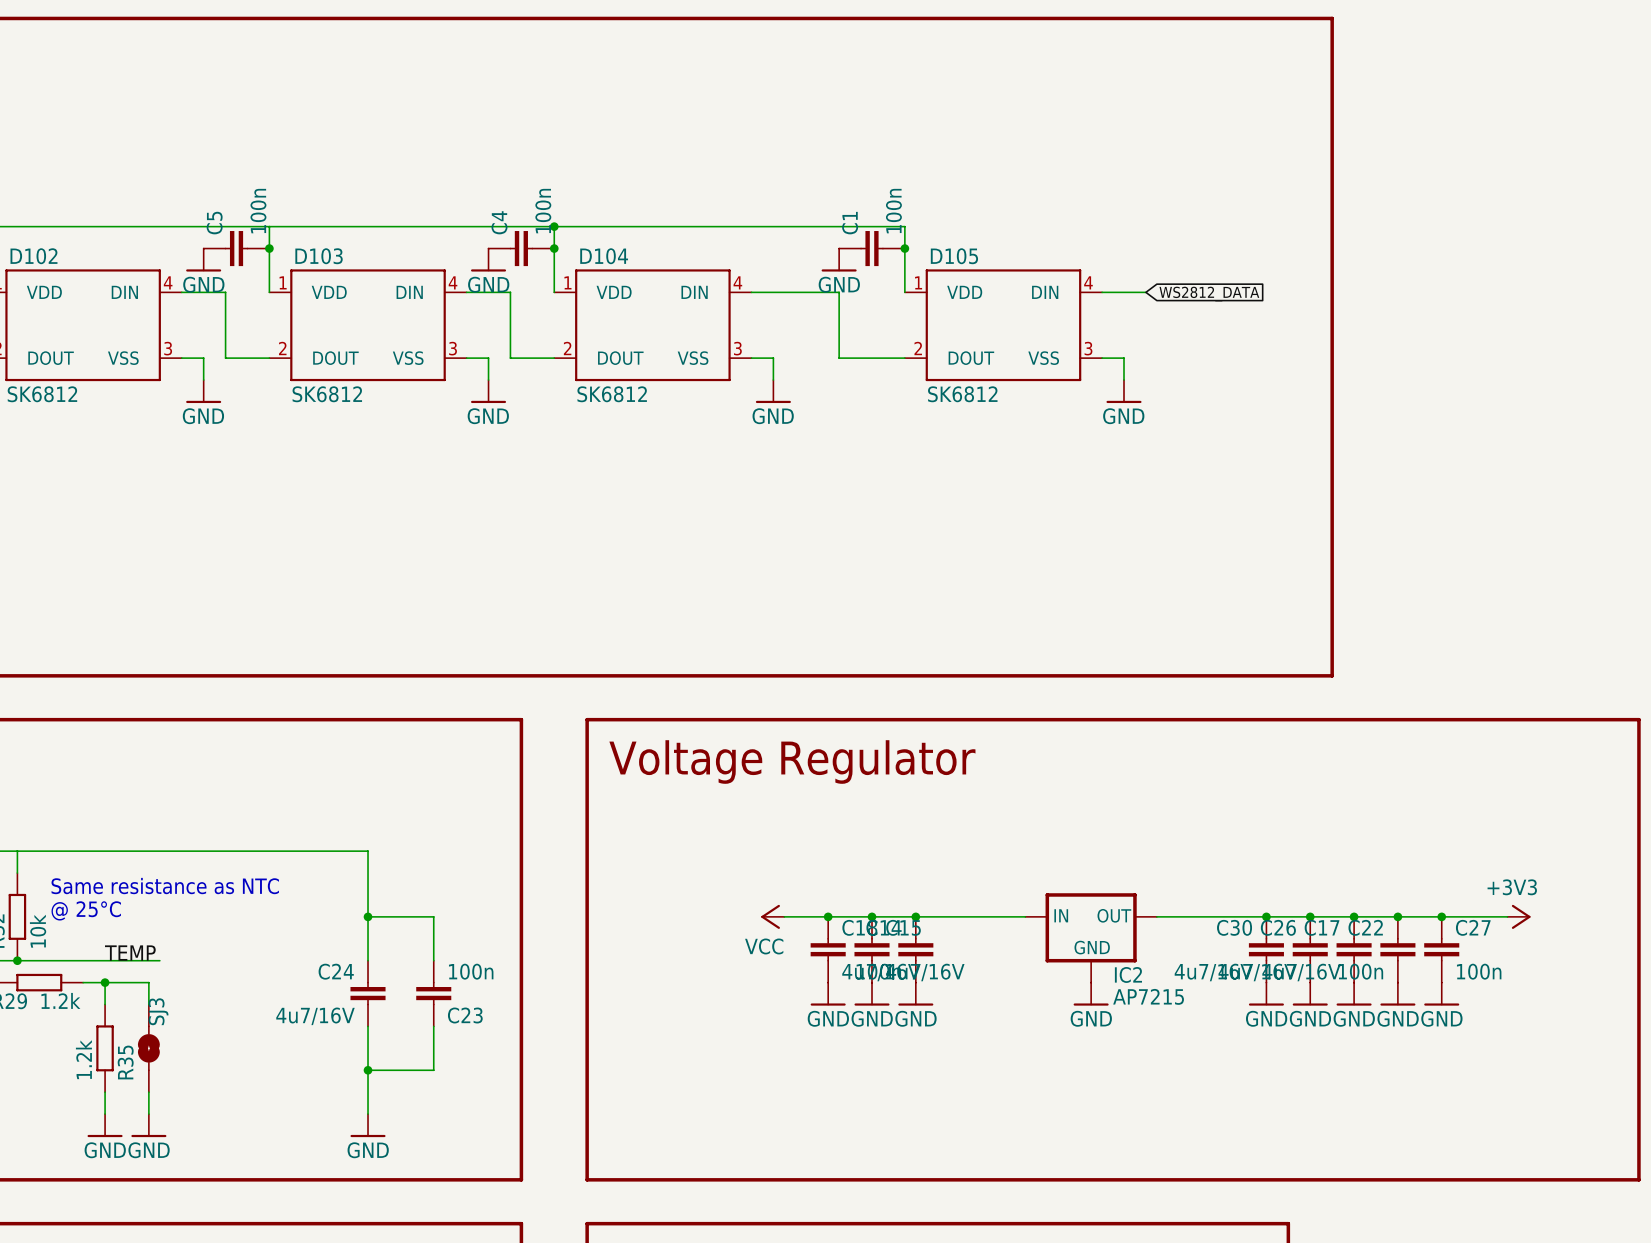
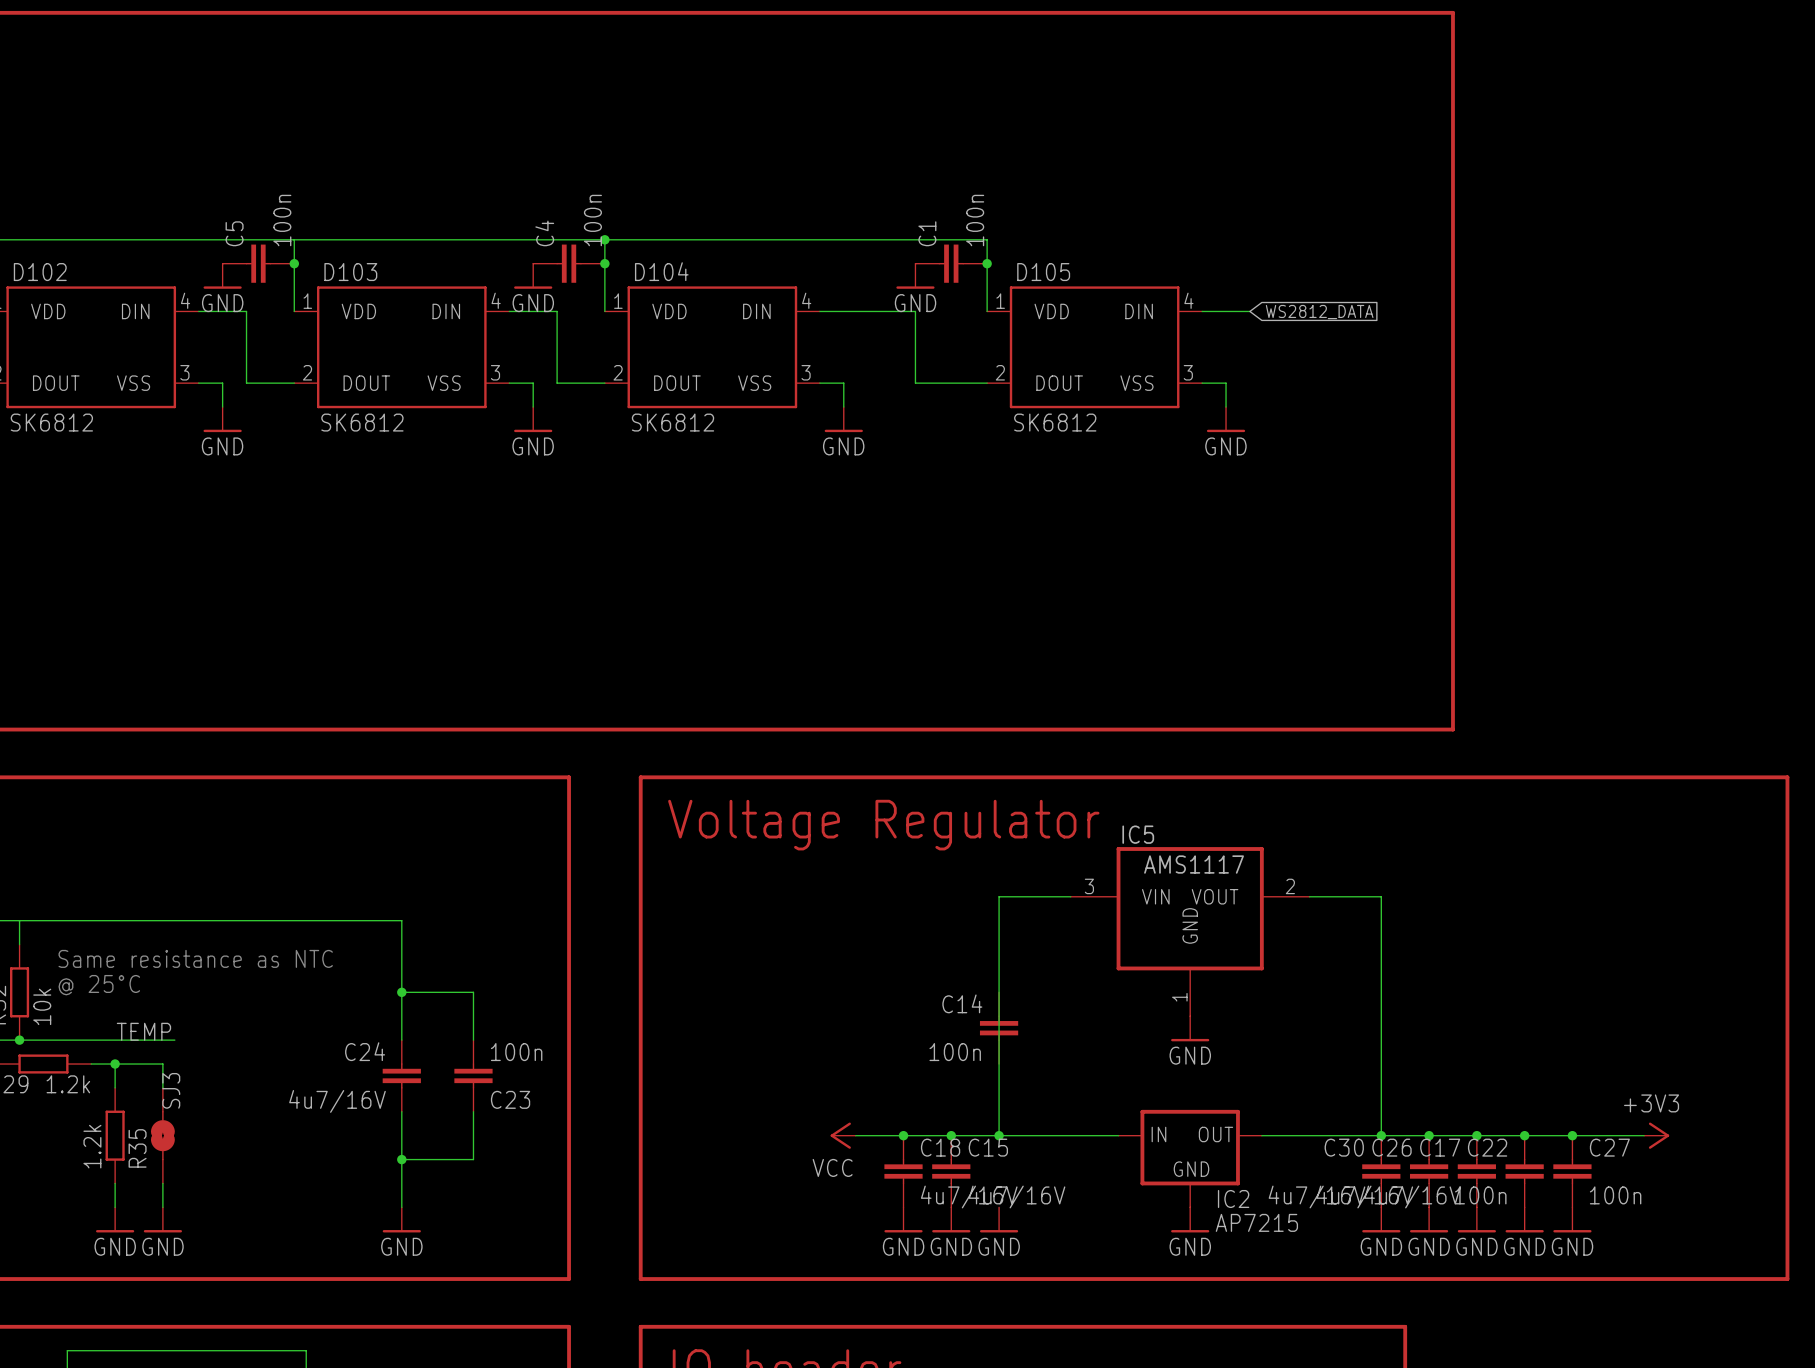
wire: none -> (1070, 896) (999, 896) (999, 1135)
wire: none -> (1309, 896) (1381, 896) (1381, 1135)
IC5: none -> AMS1117 (1190, 931)
power symbol position: VCC (772, 916) -> VCC (843, 1135)
wire: (784, 916) (1025, 916) -> (855, 1135) (1118, 1135)
junction: (828, 916) -> none
junction: (872, 916) -> none
junction: (915, 916) -> none
wire: (1156, 916) (1507, 916) -> (1261, 1135) (1644, 1135)
junction: (1266, 916) -> none
junction: (1310, 916) -> none
junction: (1354, 916) -> none
junction: (1397, 916) -> none
junction: (1441, 916) -> none
power symbol position: +3V3 (1518, 916) -> +3V3 (1656, 1135)
IC2 position: (1091, 937) -> (1190, 1158)
C18 position: (828, 949) -> (903, 1171)
C15 position: (872, 949) -> (951, 1171)
C30 position: (1266, 949) -> (1381, 1171)
C26 position: (1310, 949) -> (1429, 1171)
C17 position: (1354, 949) -> (1476, 1171)
C22 position: (1397, 949) -> (1524, 1171)
C27 position: (1441, 949) -> (1572, 1171)
power symbol: GND (828, 994) -> none
power symbol: GND (872, 994) -> none
power symbol: GND (915, 994) -> none
power symbol position: GND (1091, 994) -> GND (1190, 1028)
power symbol: GND (1266, 994) -> none
power symbol: GND (1310, 994) -> none
power symbol: GND (1354, 994) -> none
power symbol: GND (1397, 994) -> none
power symbol: GND (1441, 994) -> none
junction: none -> (903, 1135)
junction: none -> (951, 1135)
junction: none -> (999, 1135)
junction: none -> (1381, 1135)
junction: none -> (1429, 1135)
junction: none -> (1476, 1135)
junction: none -> (1524, 1135)
junction: none -> (1572, 1135)
power symbol: none -> GND (903, 1219)
power symbol: none -> GND (951, 1219)
power symbol: none -> GND (999, 1219)
power symbol: none -> GND (1190, 1219)
power symbol: none -> GND (1381, 1219)
power symbol: none -> GND (1429, 1219)
power symbol: none -> GND (1476, 1219)
power symbol: none -> GND (1524, 1219)
power symbol: none -> GND (1572, 1219)

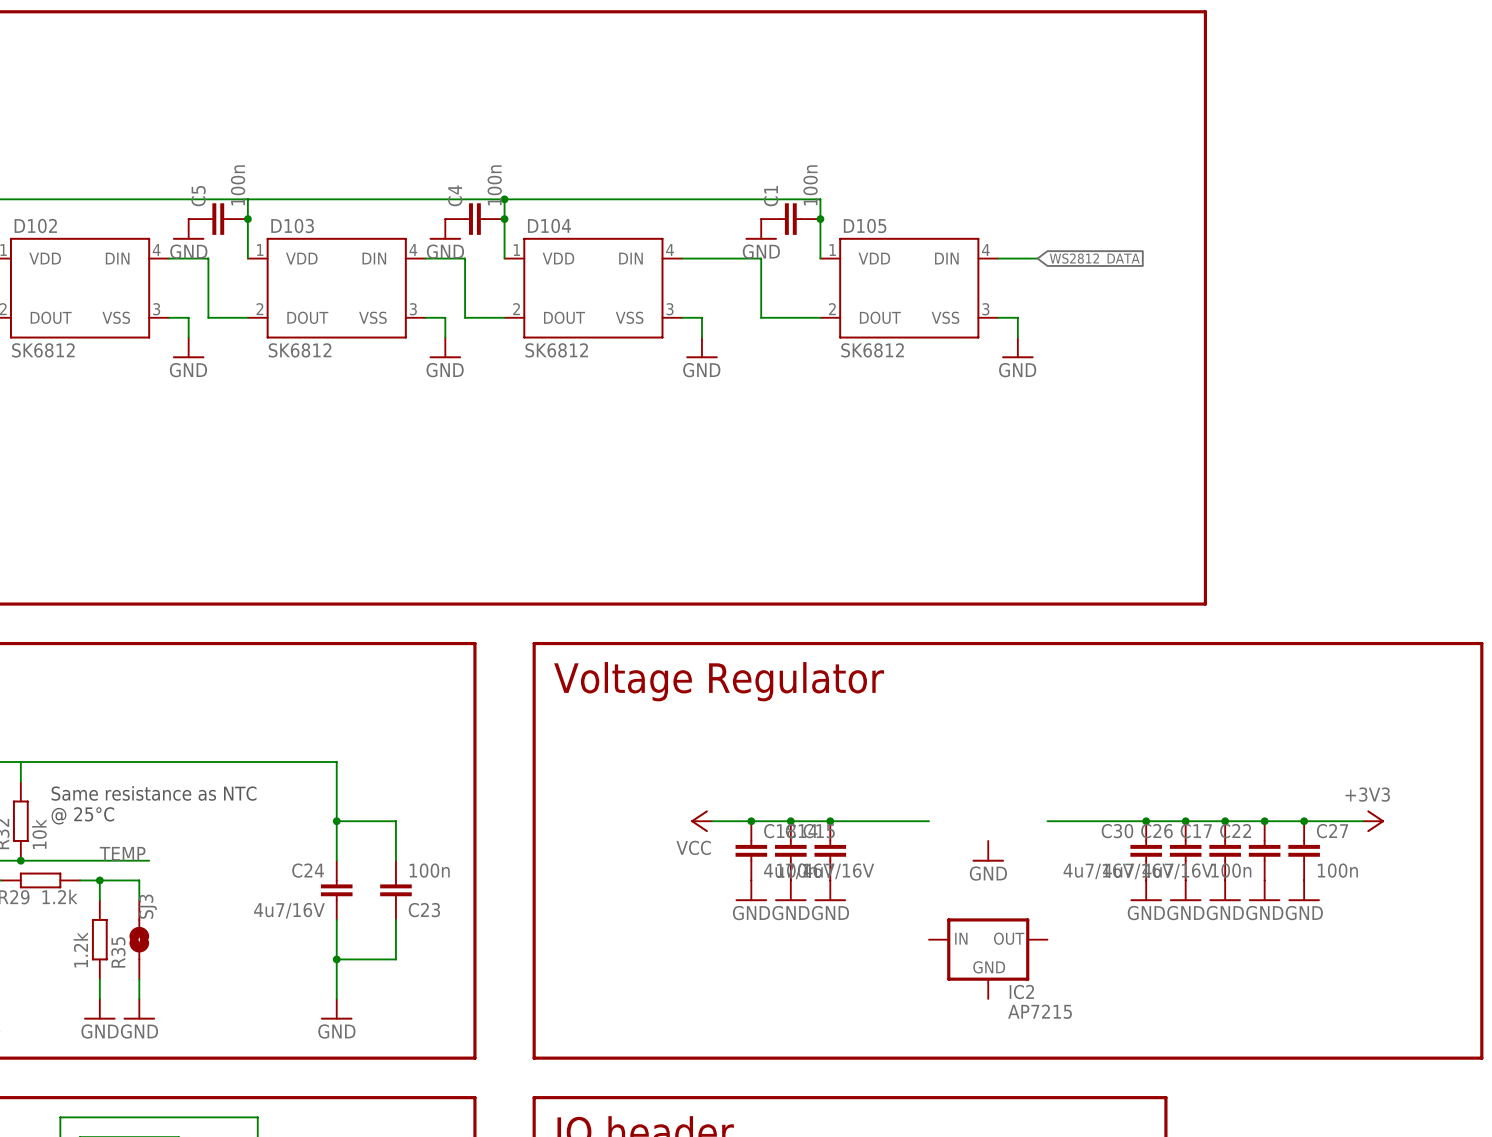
wire: (1070, 896) (999, 896) (999, 1135) -> none
wire: (1309, 896) (1381, 896) (1381, 1135) -> none
IC5: AMS1117 (1190, 931) -> none
junction: none -> (751, 821)
junction: none -> (790, 821)
junction: none -> (830, 821)
junction: none -> (1146, 821)
junction: none -> (1185, 821)
junction: none -> (1225, 821)
junction: none -> (1264, 821)
junction: none -> (1304, 821)
power symbol: none -> GND (751, 890)
power symbol: none -> GND (790, 890)
power symbol: none -> GND (830, 890)
power symbol: none -> GND (1146, 890)
power symbol: none -> GND (1185, 890)
power symbol: none -> GND (1225, 890)
power symbol: none -> GND (1264, 890)
power symbol: none -> GND (1304, 890)
power symbol position: VCC (843, 1135) -> VCC (701, 821)
wire: (855, 1135) (1118, 1135) -> (711, 821) (929, 821)
junction: (903, 1135) -> none
junction: (951, 1135) -> none
junction: (999, 1135) -> none
wire: (1261, 1135) (1644, 1135) -> (1047, 821) (1363, 821)
junction: (1381, 1135) -> none
junction: (1429, 1135) -> none
junction: (1476, 1135) -> none
junction: (1524, 1135) -> none
junction: (1572, 1135) -> none
power symbol position: +3V3 (1656, 1135) -> +3V3 (1373, 821)
C18 position: (903, 1171) -> (751, 850)
C15 position: (951, 1171) -> (790, 850)
C30 position: (1381, 1171) -> (1146, 850)
C26 position: (1429, 1171) -> (1185, 850)
C17 position: (1476, 1171) -> (1225, 850)
C22 position: (1524, 1171) -> (1264, 850)
C27 position: (1572, 1171) -> (1304, 850)
power symbol: GND (903, 1219) -> none
power symbol: GND (951, 1219) -> none
power symbol: GND (999, 1219) -> none
power symbol: GND (1190, 1219) -> none
power symbol: GND (1381, 1219) -> none
power symbol: GND (1429, 1219) -> none
power symbol: GND (1476, 1219) -> none
power symbol: GND (1524, 1219) -> none
power symbol: GND (1572, 1219) -> none

